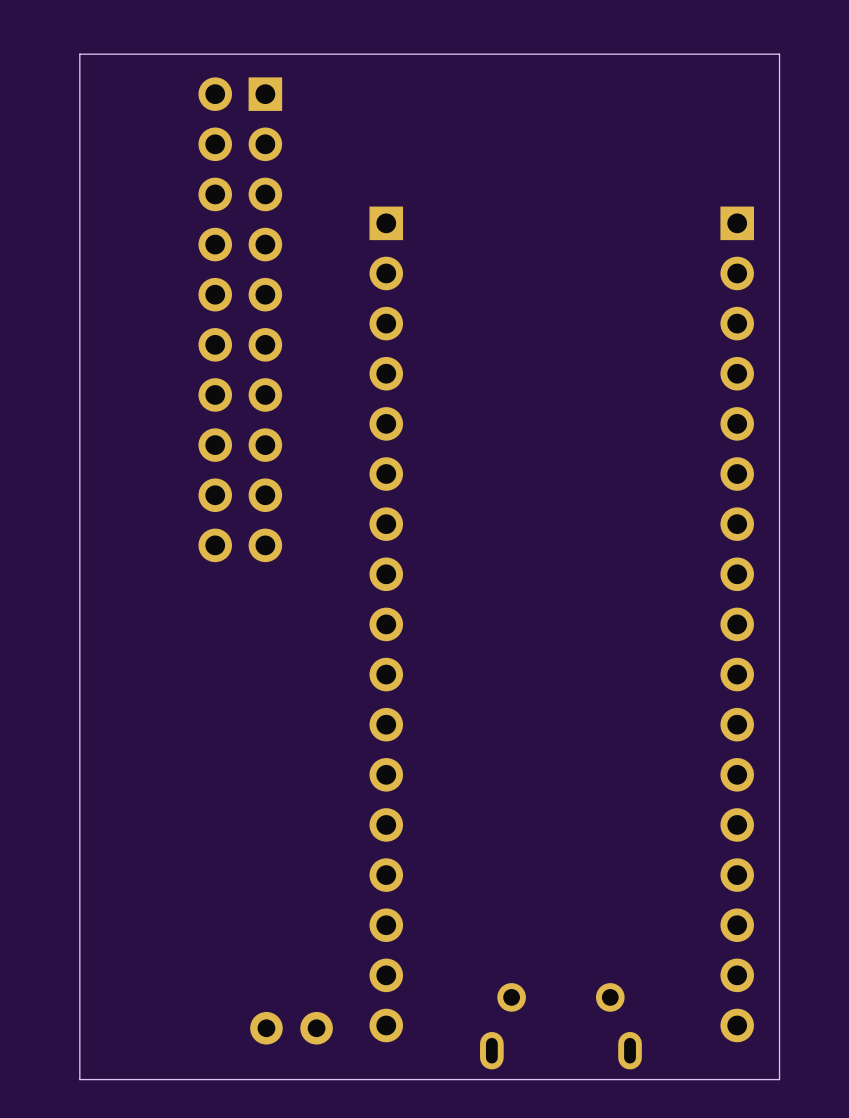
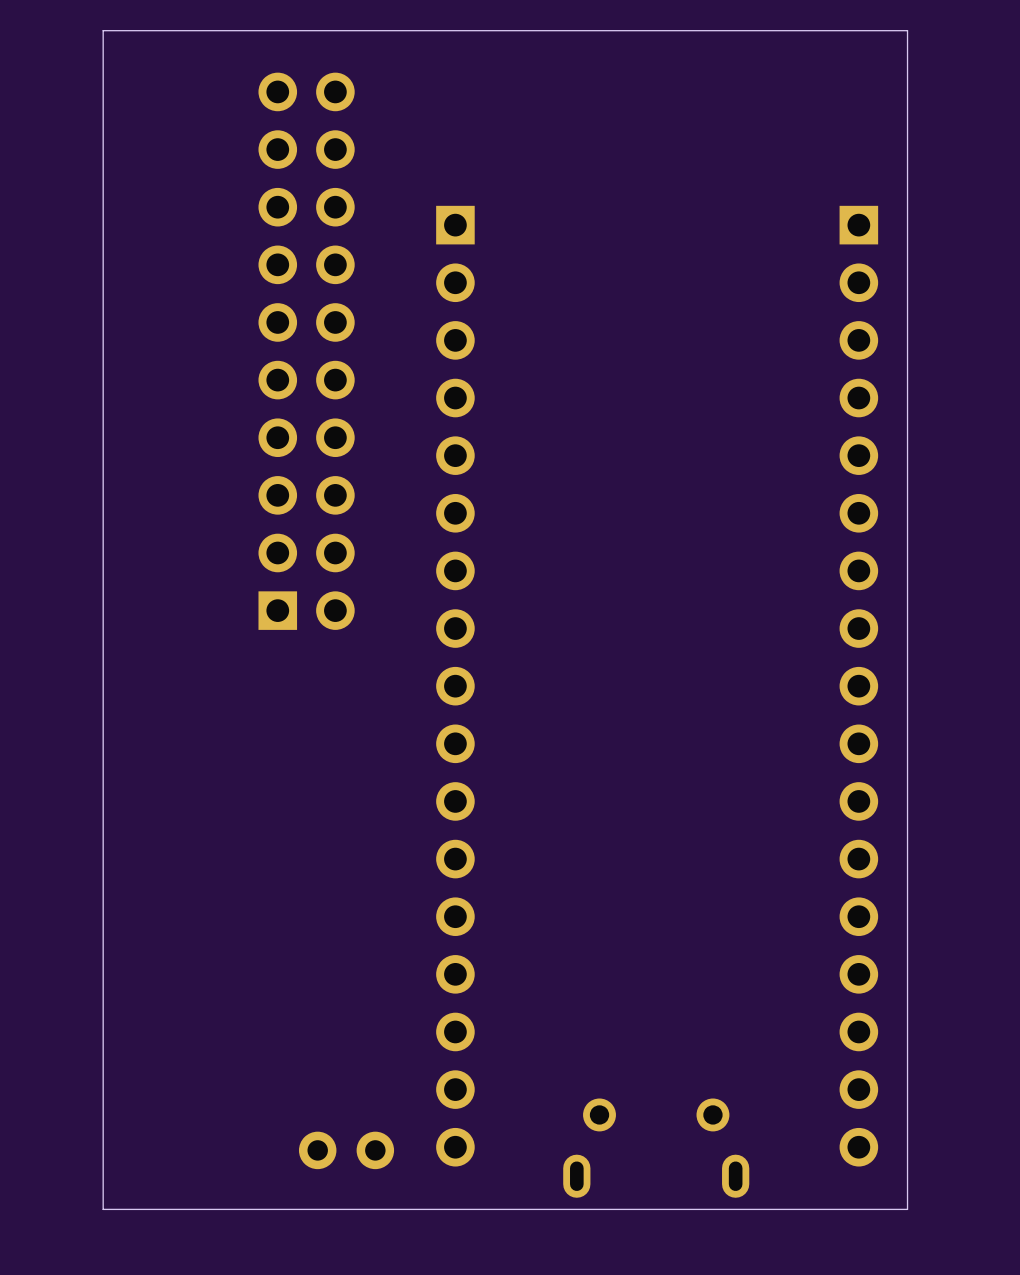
part rotation: 0° (240, 319) -> 180° (306, 351)

